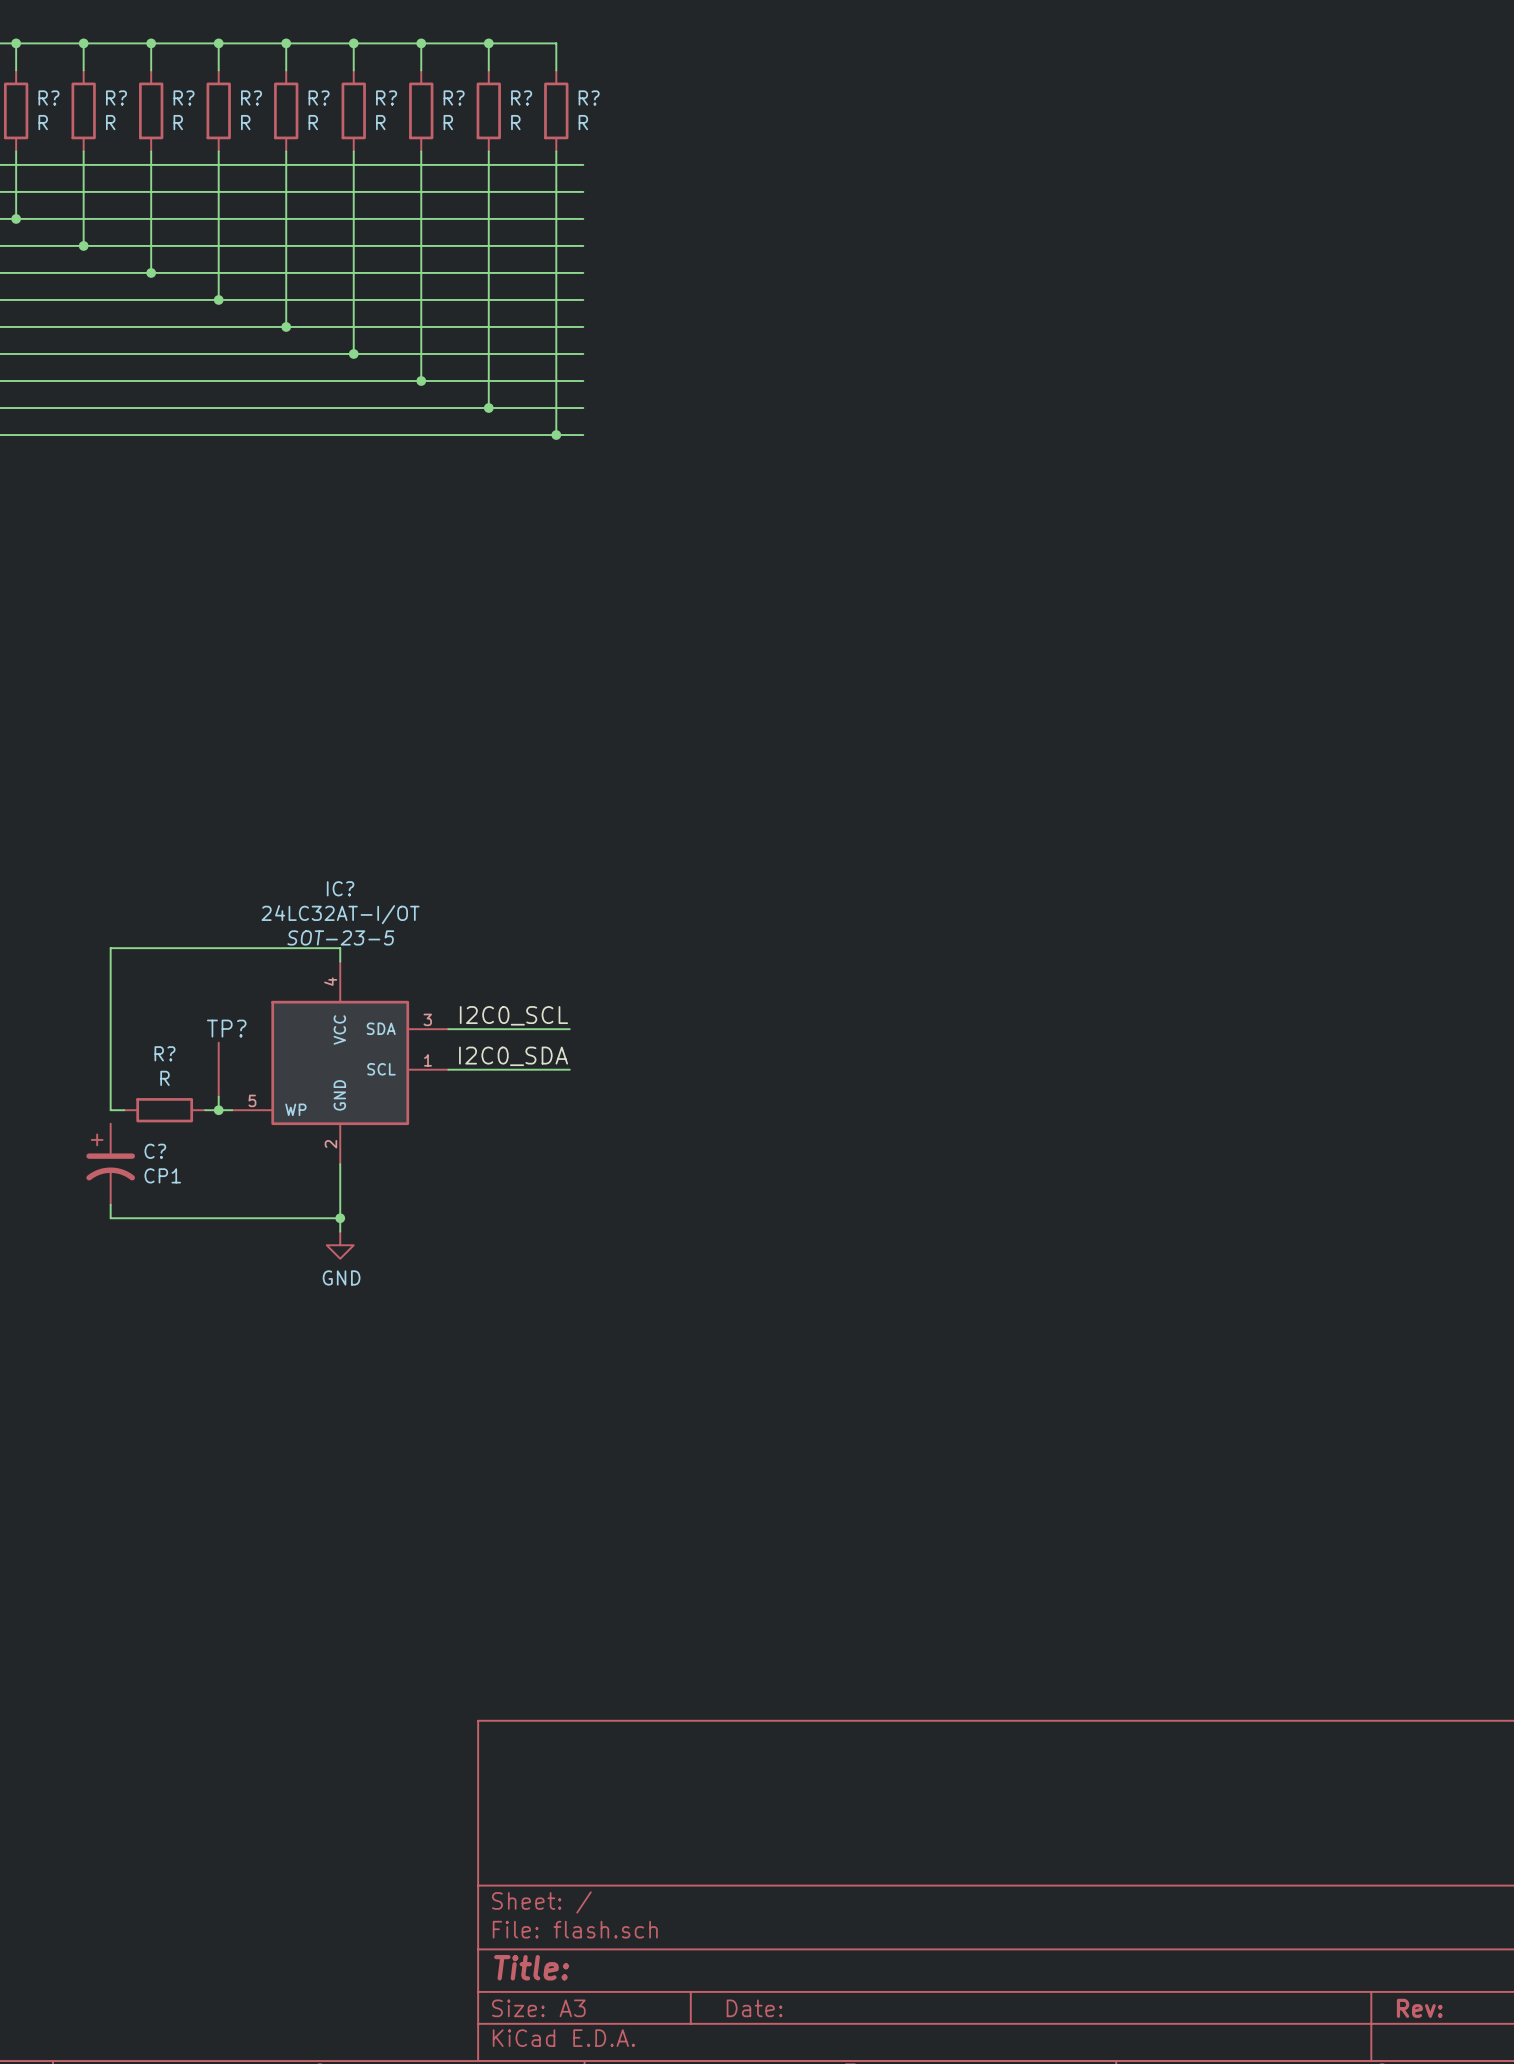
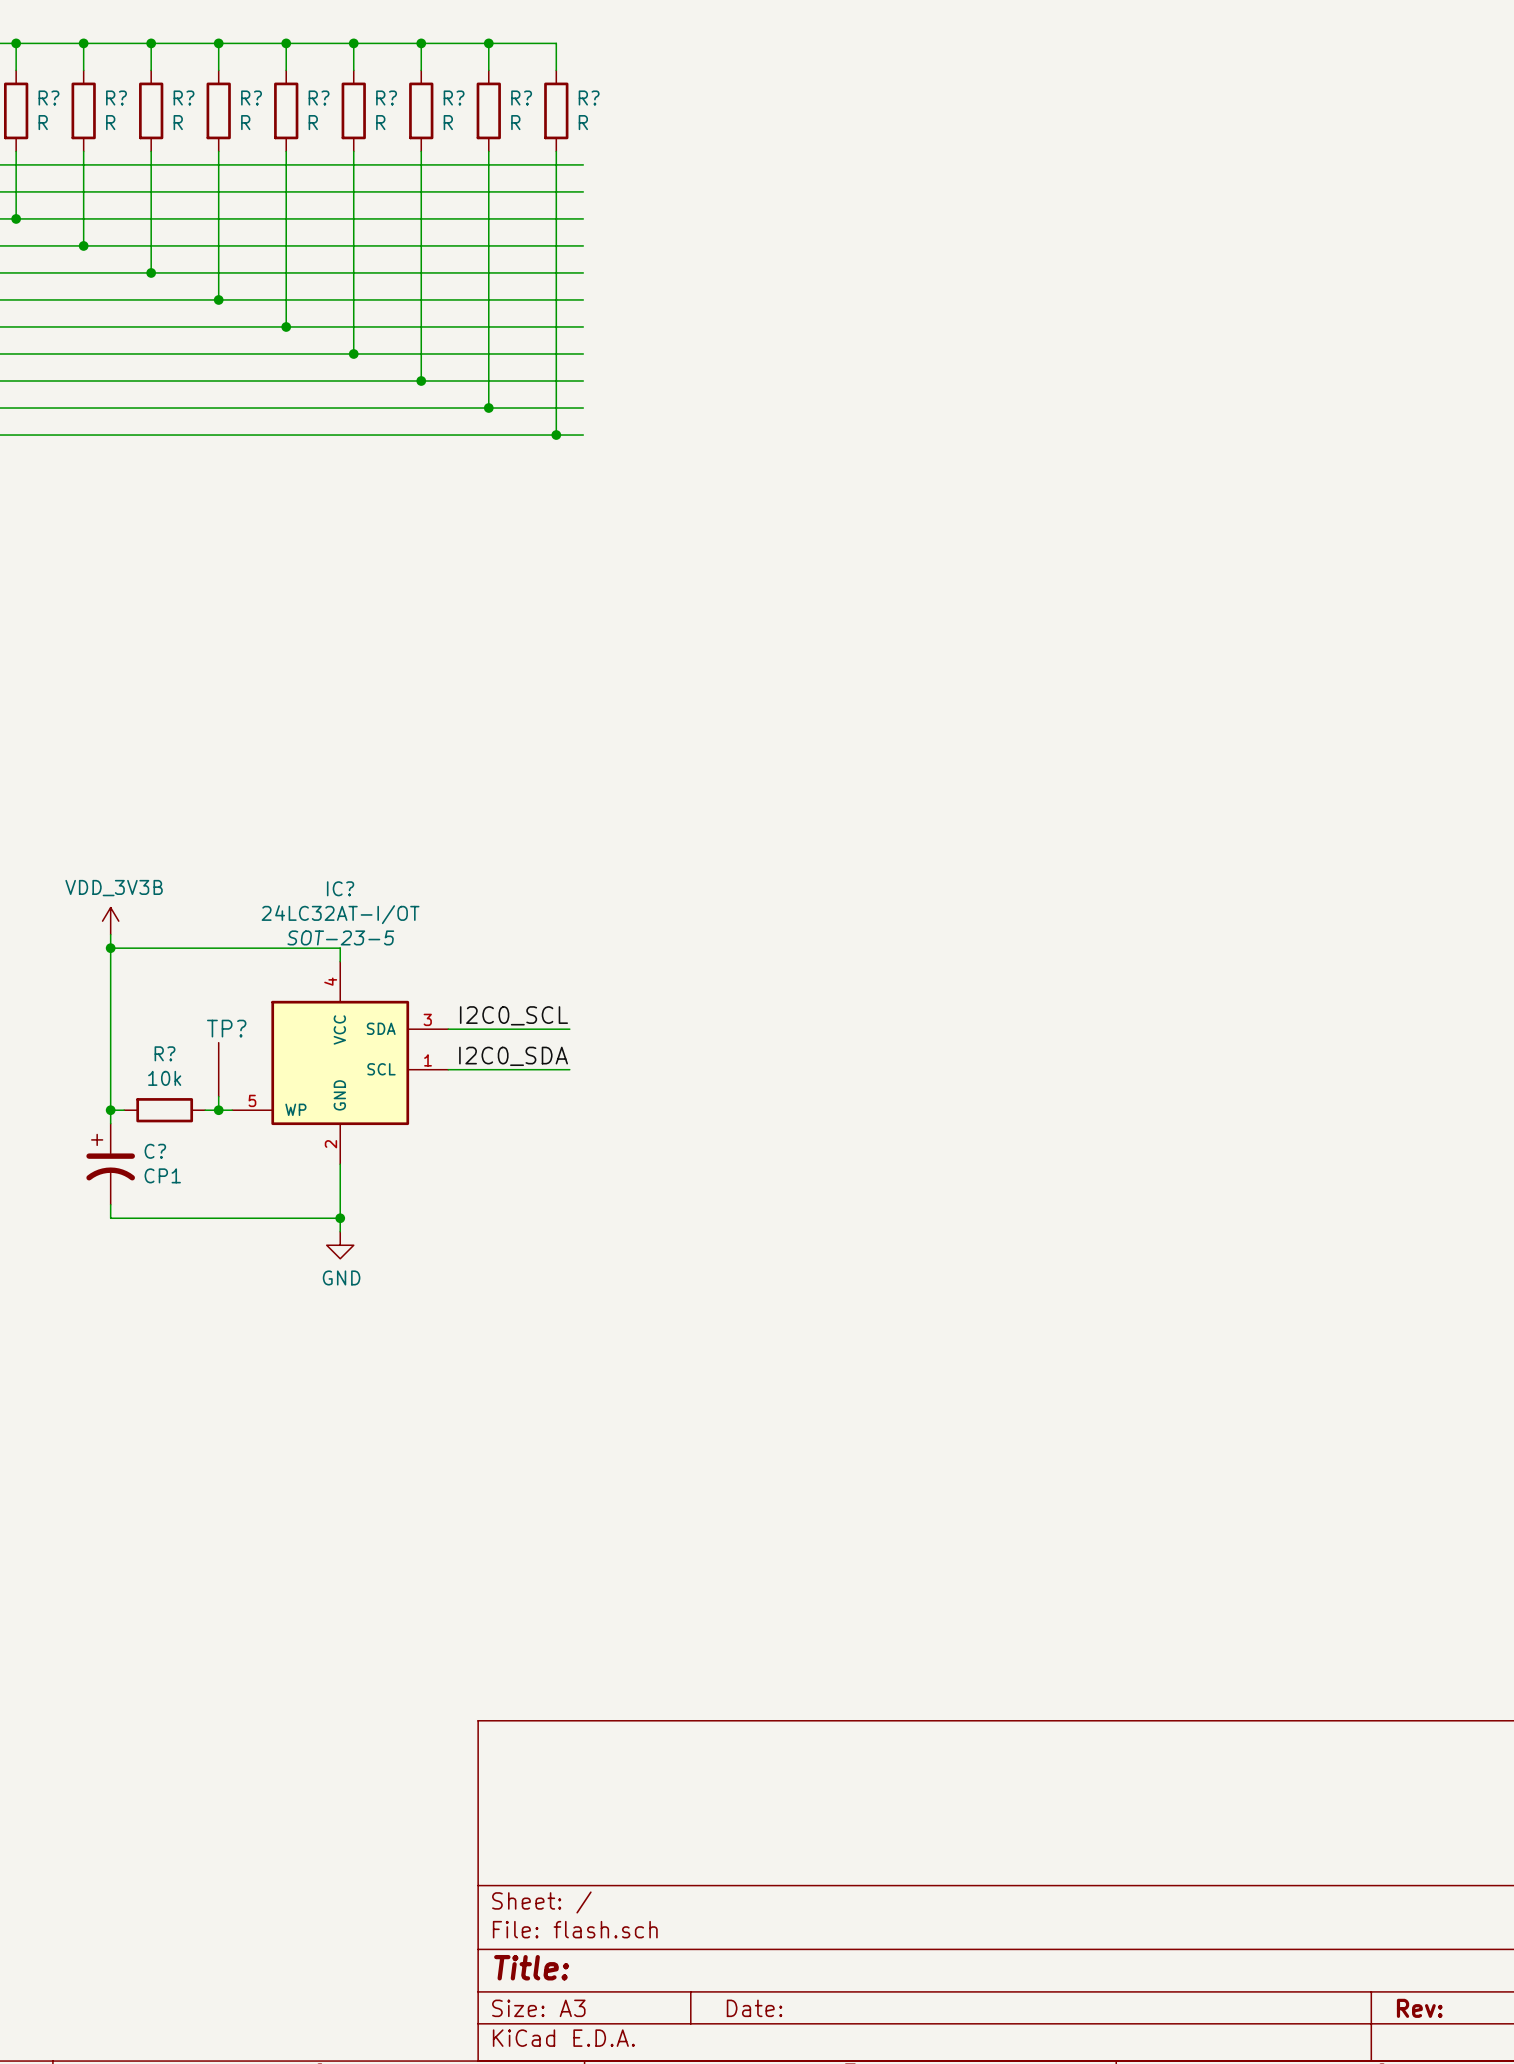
power symbol: none -> VDD_3V3B (110, 921)
wire: none -> (110, 934) (110, 948)
junction: none -> (110, 948)
R? value: R (165, 1078) -> 10k (164, 1078)
wire: none -> (110, 1110) (110, 1123)
junction: none -> (110, 1110)

